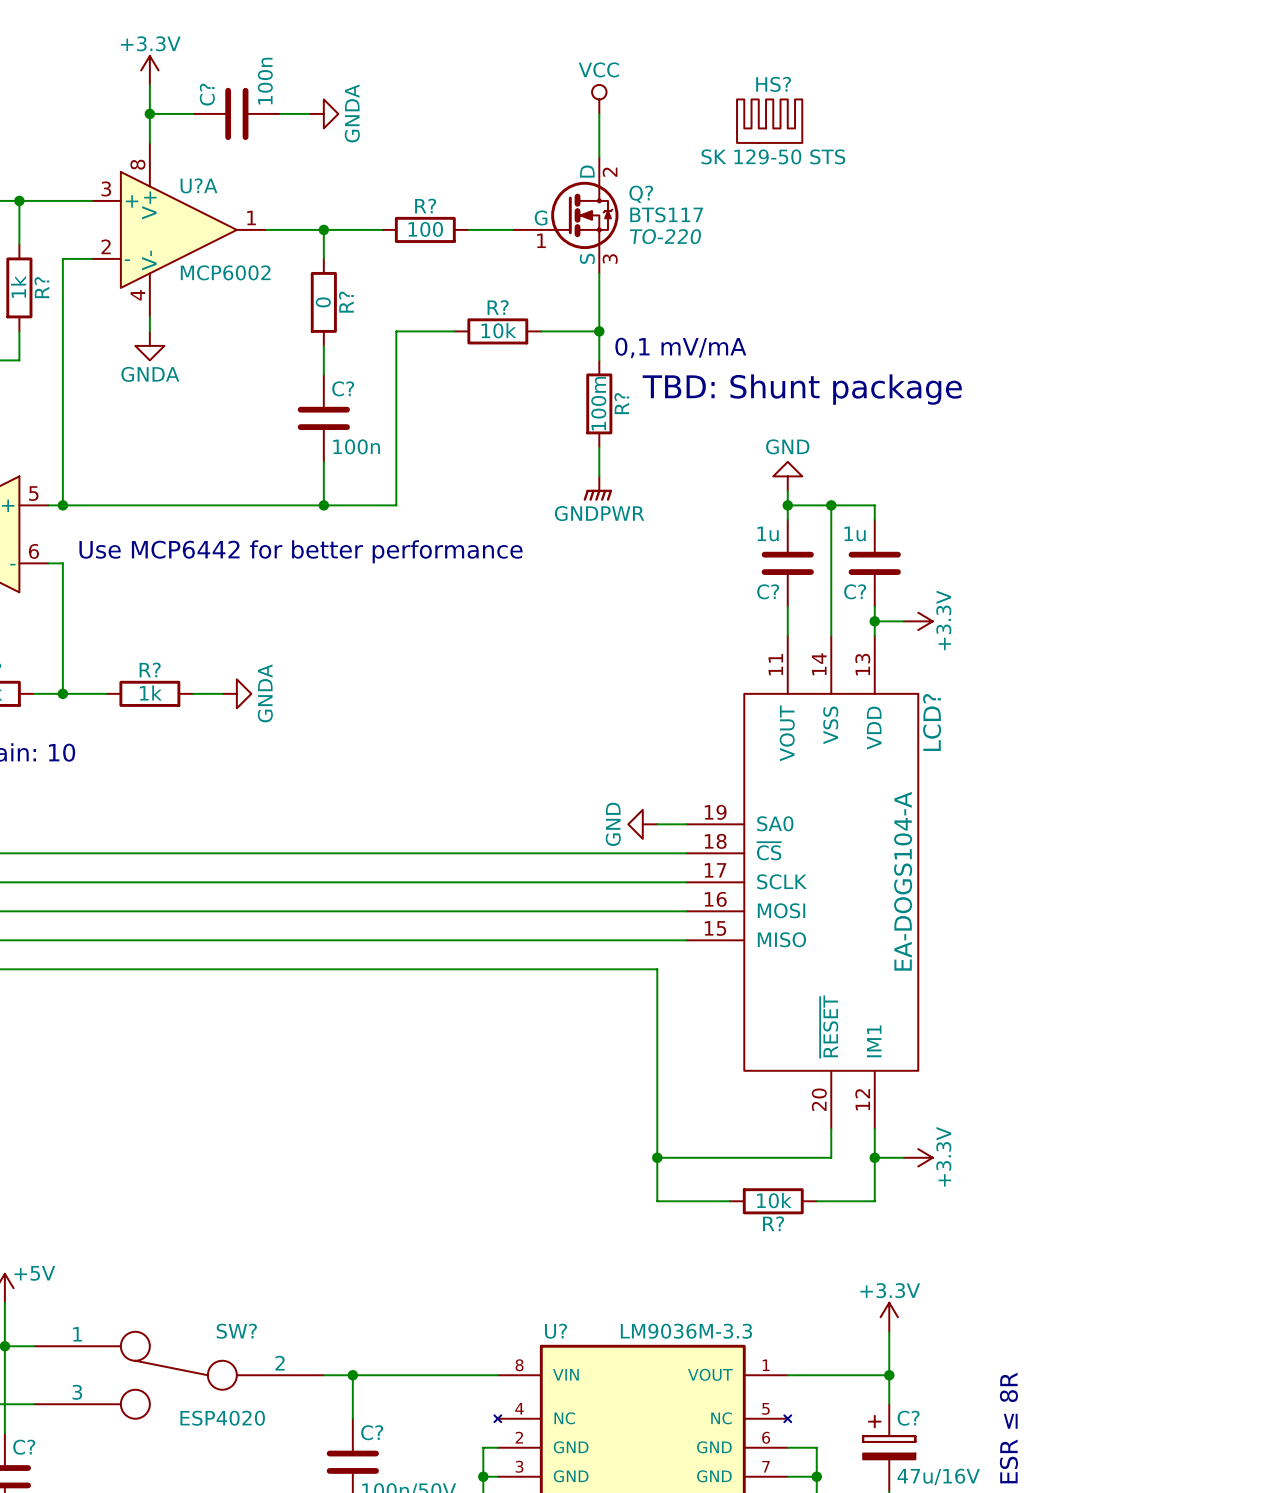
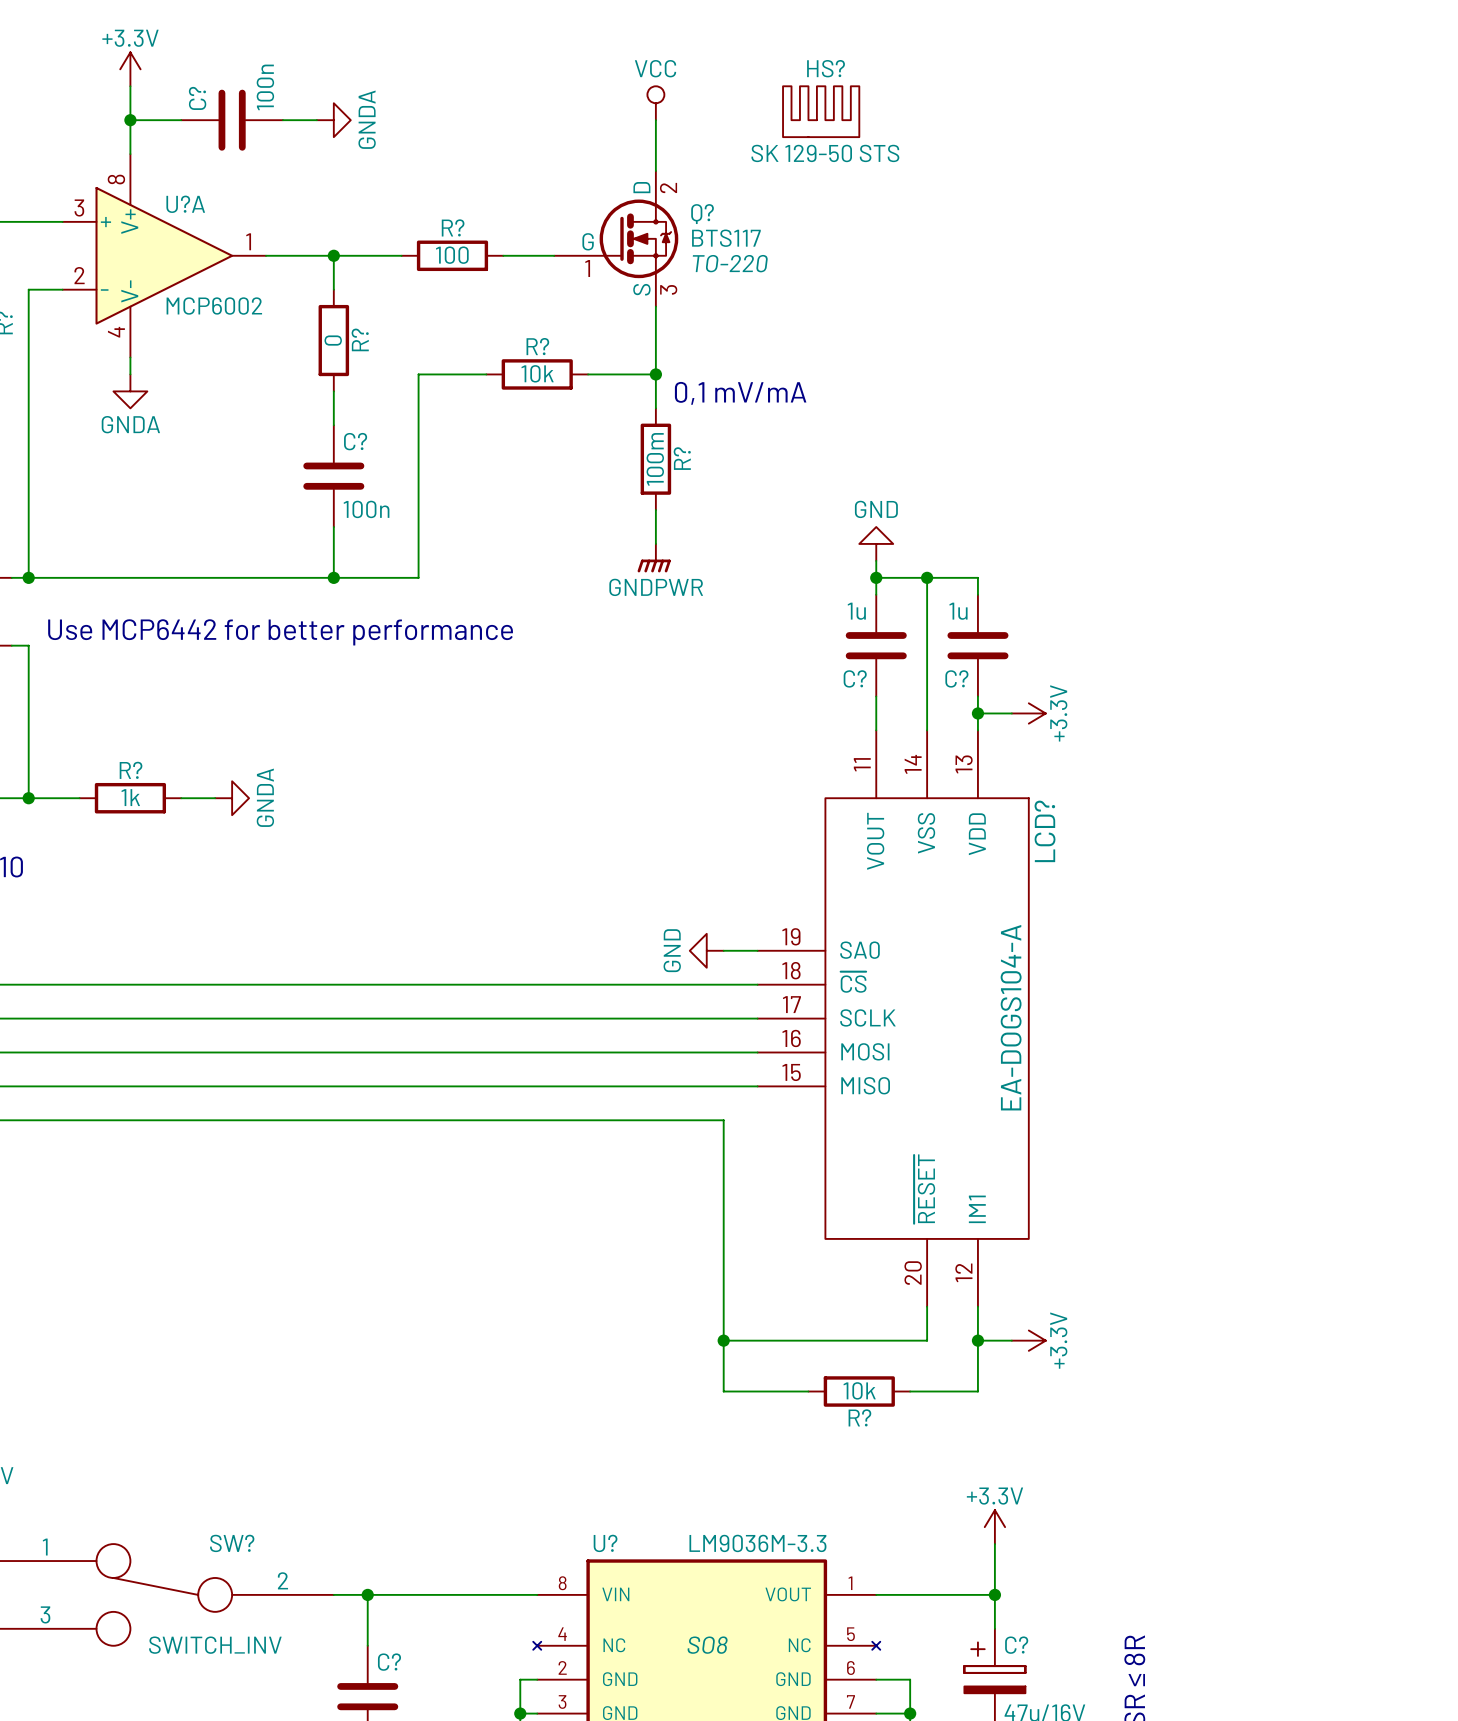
HS? position: (769, 121) -> (821, 111)
text: TBD: Shunt package (802, 389) -> none
SW? value: ESP4020 (222, 1418) -> SWITCH_INV (215, 1645)
U? text: none -> SO8 (707, 1645)

